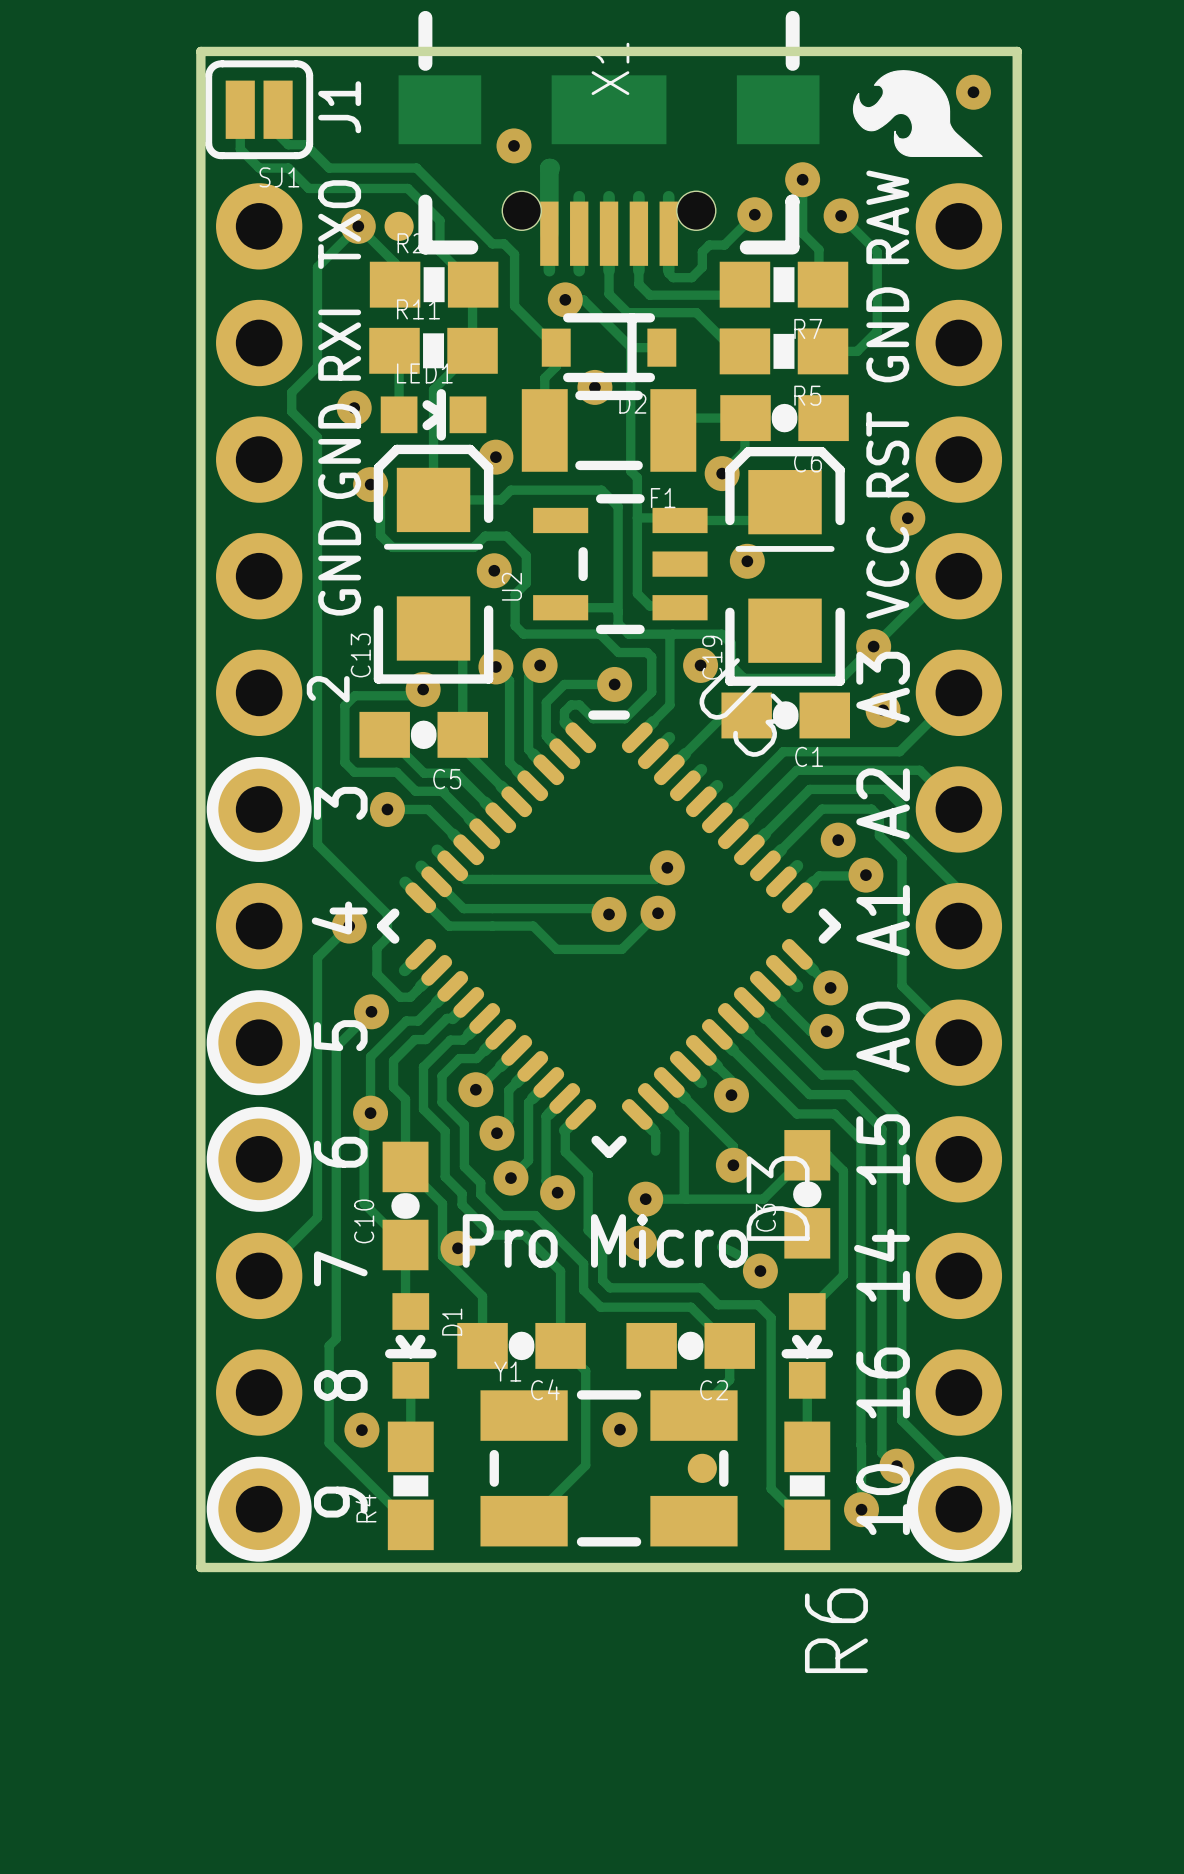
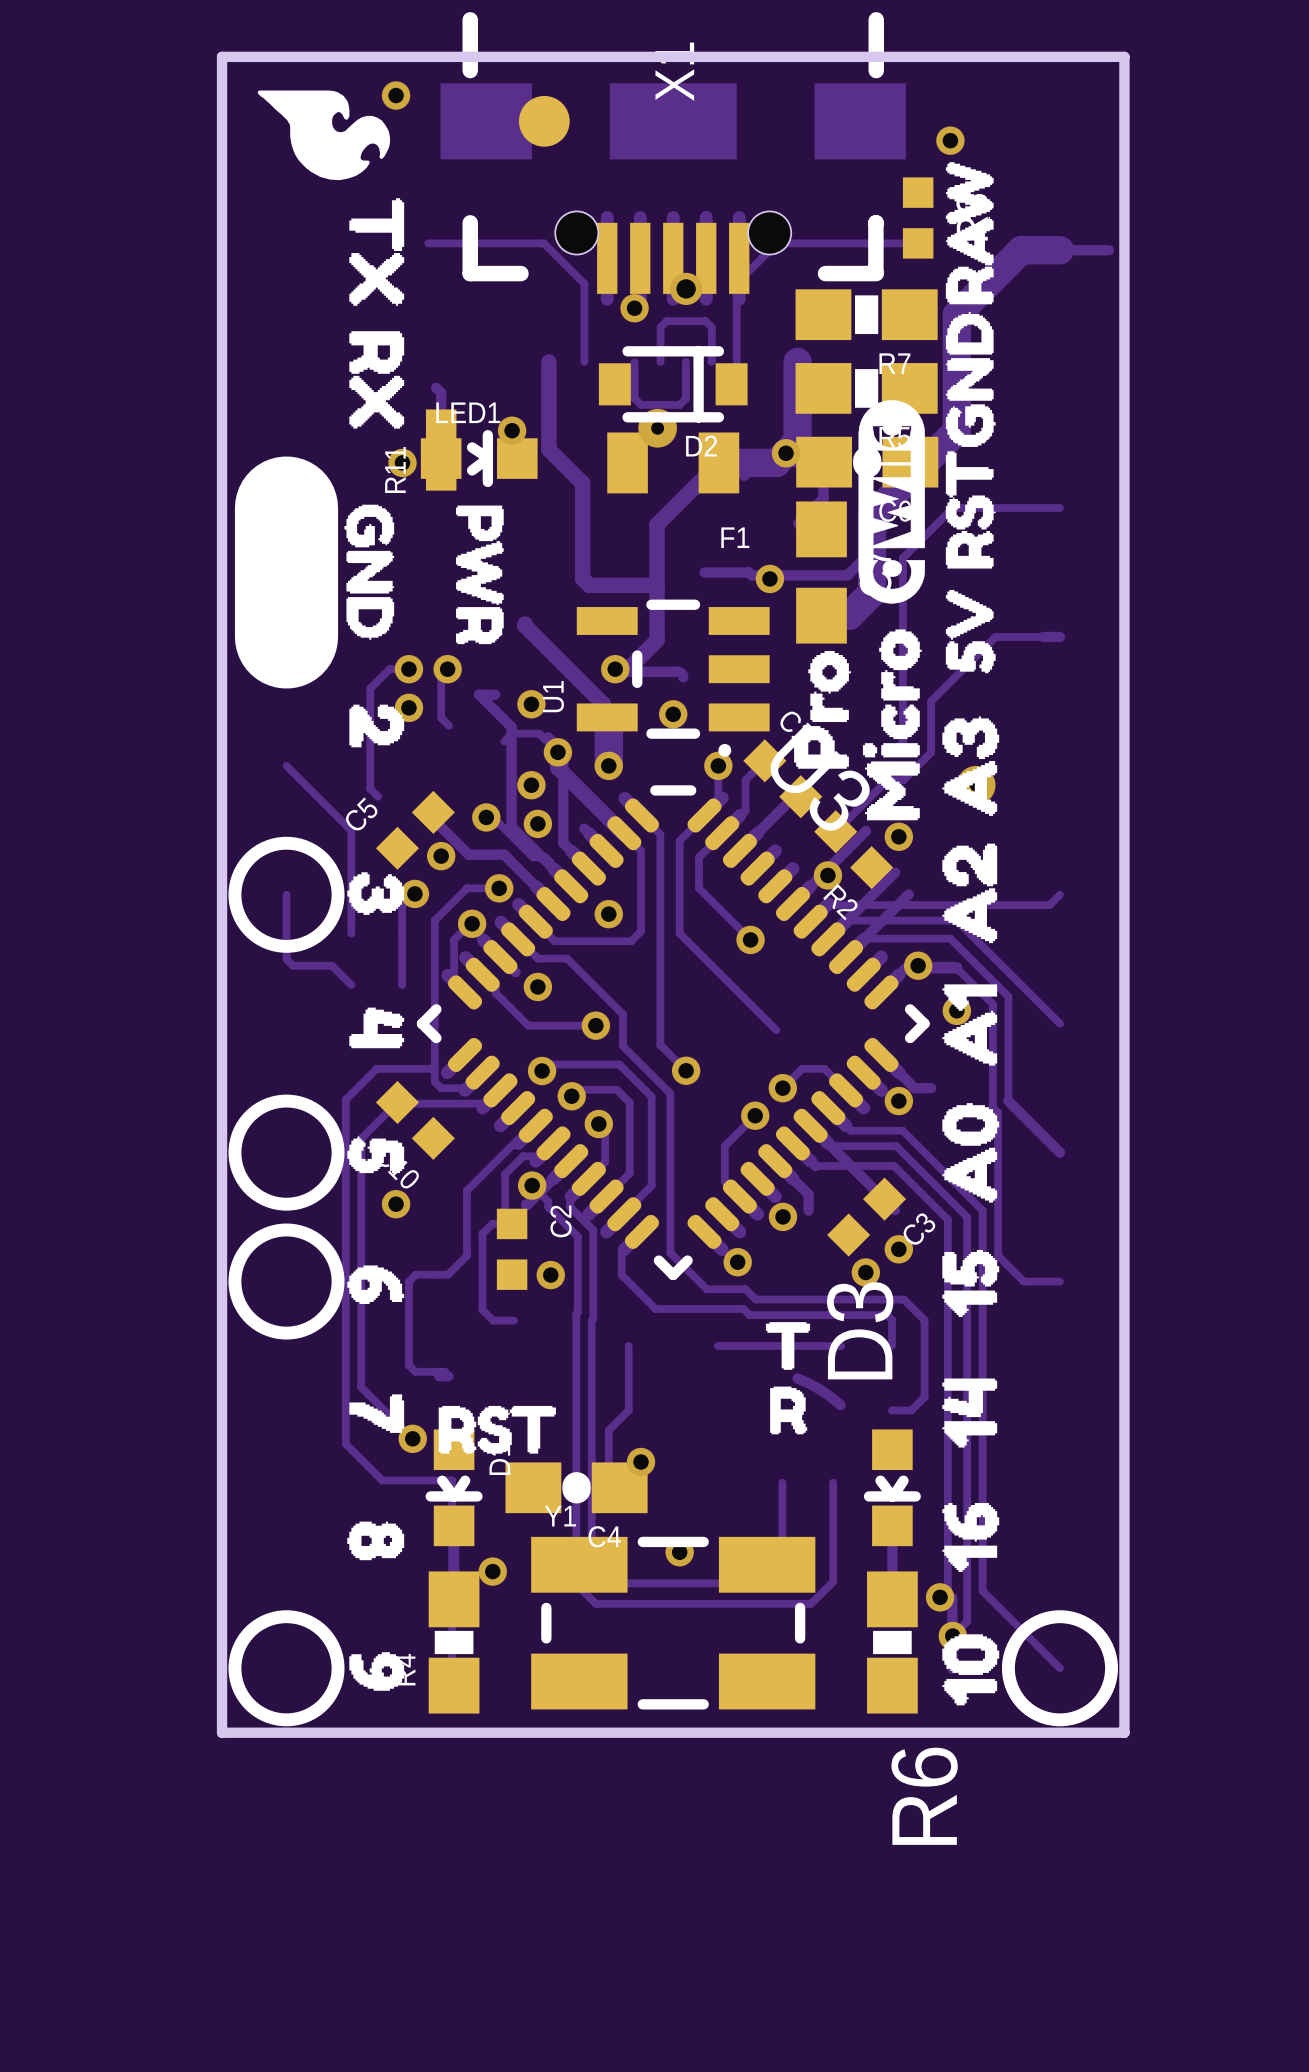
drawing: [852, 70, 983, 157] -> none
drawing: none -> [257, 90, 405, 429]
via: none -> (396, 95)
via: (973, 92) -> none
text: J1 (339, 107) -> none
track: (240, 109) (240, 149) (259, 168) (288, 168) (308, 188) (407, 188) (439, 220) (439, 251) (473, 284) -> none
SJ1: (259, 109) -> none
track: (278, 109) (278, 134) (288, 144) (305, 144) (329, 168) (416, 168) (492, 243) (504, 243) (514, 254) (514, 305) (556, 347) (556, 366) (544, 378) (544, 430) -> none
part: none -> (544, 121)
via: none -> (950, 140)
via: (513, 145) -> none
drawing: none -> [794, 162, 1000, 1317]
track: (550, 168) (549, 233) -> none
track: (802, 179) (802, 233) (818, 249) (818, 280) (822, 284) (822, 270) -> none
via: (802, 179) -> none
part: none -> (918, 218)
track: (754, 214) (724, 245) (709, 245) (702, 252) (702, 267) (691, 277) (673, 277) (668, 273) (668, 233) -> none
via: (754, 214) -> none
track: (841, 215) (877, 252) (877, 331) (857, 351) (822, 351) -> none
via: (841, 215) -> none
text: RAW (887, 217) -> none
track: none -> (428, 243) (543, 243) (584, 283) (584, 361)
track: none -> (918, 243) (776, 243) (736, 283) (736, 361)
text: TXO (339, 224) -> none
via: (358, 226) -> none
part: (399, 226) -> none
track: none -> (1108, 250) (1021, 250) (956, 314) (956, 430) (872, 515) (872, 592) (849, 615) (821, 615)
track: (609, 233) (609, 294) (627, 312) (696, 312) (735, 351) (744, 351) -> none
track: (638, 233) (638, 284) (649, 295) (735, 295) (744, 284) -> none
R2 footprint: [369, 261, 499, 308] -> [814, 810, 894, 890]
via: none -> (686, 288)
track: (395, 284) (395, 263) (358, 226) (317, 267) (317, 366) (291, 392) (291, 411) (317, 437) (317, 844) (387, 914) (387, 937) (376, 948) (376, 973) (400, 997) (410, 997) (420, 986) -> none
track: (472, 285) (472, 350) (433, 389) (433, 499) (501, 499) (510, 490) (601, 490) (618, 506) (618, 623) (628, 634) (721, 634) (731, 643) (731, 665) (743, 678) (841, 678) (943, 576) -> (835, 831) (887, 780) (903, 780) (931, 752) (931, 701) (995, 636) (1043, 636)
track: (565, 299) (583, 299) (631, 347) (661, 347) -> none
via position: (565, 299) -> (634, 308)
track: none -> (711, 361) (711, 327) (705, 321) (666, 321) (660, 327) (660, 361)
R11 footprint: [369, 327, 498, 374] -> [425, 409, 457, 491]
track: none -> (548, 361) (548, 449) (582, 483) (582, 578) (589, 585) (657, 585)
track: none -> (685, 361) (685, 398) (679, 404) (641, 404) (634, 398) (634, 362)
track: none -> (797, 361) (797, 441) (776, 462) (718, 462) (657, 524) (657, 640) (628, 669) (615, 669)
text: GND (887, 334) -> none
text: RXI (339, 345) -> none
track: (630, 348) (630, 471) (637, 477) (637, 593) (649, 605) (678, 605) (680, 607) -> none
via: none -> (512, 430)
F1 footprint: [521, 389, 697, 472] -> [607, 432, 740, 494]
via size: [336, 390, 372, 426] -> [388, 448, 417, 478]
via: none -> (786, 453)
text: GND (339, 451) -> none
text: RST (887, 454) -> none
drawing: none -> [344, 504, 395, 640]
drawing: none -> [456, 505, 504, 645]
via: (495, 457) -> none
line: none -> (286, 508) (286, 636)
track: none -> (1059, 508) (952, 508) (902, 557) (902, 742) (892, 752)
via: (722, 473) -> none
track: (370, 484) (380, 496) (380, 535) (392, 547) (473, 547) (485, 536) (506, 536) (526, 555) (526, 583) (515, 594) (515, 625) (523, 634) (600, 634) (618, 652) (647, 652) (651, 657) (651, 692) (625, 718) (593, 718) (579, 704) (571, 704) (564, 711) (564, 721) (580, 737) -> (686, 1070) (660, 1044) (660, 834) (641, 815)
via: (370, 484) -> none
part: none -> (821, 572)
via: (907, 518) -> none
via: none -> (769, 578)
via: (747, 561) -> none
C13: (433, 564) -> none
track: none -> (524, 624) (603, 703) (603, 717) (608, 718) (608, 765)
U2: (620, 564) -> none
C19: (785, 566) -> none
text: GND (339, 568) -> none
via: (494, 570) -> none
text: VCC (887, 572) -> none
track: none -> (408, 669) (389, 669) (370, 688) (370, 788) (378, 796)
via: none -> (408, 669)
track: none -> (447, 669) (441, 675) (441, 717) (449, 725)
via: none -> (447, 669)
via: none -> (615, 669)
U1: none -> (673, 678)
track: (672, 634) (669, 637) (669, 705) (653, 721) -> none
drawing: none -> [349, 704, 405, 748]
via: none -> (531, 704)
via: none -> (408, 707)
via: none -> (673, 714)
via: (873, 646) -> none
via size: [478, 649, 514, 685] -> [543, 738, 573, 767]
track: (540, 665) (528, 676) (528, 749) -> none
via position: (540, 665) -> (608, 765)
via: (700, 665) -> none
track: (614, 684) (564, 684) (546, 702) (546, 736) -> none
via: (614, 684) -> none
text: A3 (883, 687) -> none
track: none -> (764, 760) (745, 780) (745, 810) (699, 857) (699, 888) (750, 939)
text: 2 (328, 689) -> none
track: (423, 689) (416, 695) (354, 695) (344, 705) (344, 762) (354, 772) (396, 772) (415, 791) (443, 791) (484, 833) -> (504, 741) (512, 733) (539, 733) (557, 752) (557, 767) (641, 850) (641, 931) (631, 941) (554, 941) (535, 921)
via: (423, 689) -> none
track: none -> (286, 765) (351, 830) (351, 933)
track: none -> (718, 765) (718, 802) (679, 840) (679, 933) (776, 1030)
via: none -> (718, 765)
C1 footprint: [721, 692, 851, 739] -> [743, 739, 823, 819]
track: (958, 692) (899, 751) (783, 751) -> none
via: none -> (531, 785)
C5 footprint: [359, 711, 489, 758] -> [375, 790, 455, 870]
track: none -> (486, 817) (492, 823) (499, 823) (533, 857) (545, 857) (550, 862) (550, 865)
via: none -> (486, 817)
via: none -> (537, 823)
via: none -> (898, 836)
via: none -> (441, 856)
drawing: none -> [347, 872, 405, 915]
track: (809, 789) (885, 789) (901, 805) (901, 832) (958, 889) (958, 926) -> (846, 920) (956, 920) (1059, 1023)
via size: [369, 791, 405, 827] -> [400, 879, 430, 909]
via: none -> (827, 875)
text: 3 (340, 803) -> none
track: none -> (499, 888) (466, 888) (434, 920) (434, 1081) (441, 1088) (468, 1088) (483, 1073)
via: none -> (499, 888)
text: A2 (883, 803) -> none
track: none -> (414, 893) (402, 905) (402, 985)
track: none -> (286, 894) (286, 959) (292, 965) (332, 965) (351, 985)
track: (387, 809) (428, 809) (453, 834) -> none
track: (822, 809) (871, 809) (879, 816) (879, 835) (901, 858) (901, 985) (912, 996) -> (864, 938) (950, 938) (1008, 996) (1008, 1101)
track: (958, 809) (919, 770) (796, 770) (733, 833) -> (1059, 894) (1049, 905) (827, 905) (810, 921)
via: none -> (608, 914)
via: none -> (472, 923)
via: (838, 840) -> none
track: none -> (518, 939) (537, 958) (567, 958) (622, 1014) (622, 1046) (670, 1093) (670, 1252) (706, 1289) (745, 1289) (755, 1299) (903, 1299) (924, 1320) (924, 1397) (911, 1410) (891, 1410)
part: (259, 867) -> none
track: (667, 867) (655, 879) (464, 879) -> none
via position: (667, 867) -> (750, 939)
part: (958, 867) -> none
track: none -> (918, 965) (954, 965) (992, 1004) (992, 1107) (998, 1112) (998, 1255) (1023, 1281) (1059, 1281)
via: none -> (918, 965)
via: (865, 875) -> none
track: (436, 881) (463, 908) (603, 908) (609, 914) -> (483, 974) (495, 986) (495, 992) (528, 1025) (595, 1025)
via: none -> (537, 986)
track: (420, 897) (448, 926) (533, 926) (556, 949) (621, 949) (658, 913) -> (465, 992) (454, 980) (454, 939) (472, 923)
drawing: none -> [349, 1007, 405, 1049]
via: (658, 913) -> none
via: (609, 914) -> none
via: none -> (956, 1010)
text: 4 (339, 917) -> none
text: A1 (883, 920) -> none
track: (349, 926) (317, 957) (317, 1217) (259, 1275) -> none
via: (349, 926) -> none
via: none -> (595, 1025)
track: none -> (434, 1068) (376, 1068) (345, 1099) (345, 1443) (382, 1480) (452, 1480) (452, 1688)
track: none -> (542, 1071) (548, 1064) (619, 1064) (651, 1096) (651, 1185) (623, 1213)
via: none -> (542, 1071)
via: none -> (686, 1070)
track: none -> (782, 1088) (802, 1068) (824, 1068) (846, 1090)
via: none -> (782, 1088)
track: none -> (500, 1090) (487, 1103) (397, 1102) (361, 1138) (361, 1387) (412, 1438)
via position: (830, 987) -> (898, 1101)
track: none -> (571, 1096) (578, 1089) (616, 1089) (629, 1102) (629, 1173) (606, 1196)
via: none -> (571, 1096)
track: (436, 1002) (418, 1021) (406, 1021) (370, 1056) (370, 1113) (364, 1119) (364, 1203) (405, 1245) (405, 1306) (410, 1311) -> none
track: (749, 1002) (821, 1075) (854, 1075) (901, 1122) (901, 1420) (958, 1477) (958, 1509) -> (828, 1108) (850, 1130) (902, 1130) (982, 1210) (982, 1590) (1059, 1668)
track: (781, 1002) (810, 1031) (826, 1031) -> none
track: none -> (755, 1115) (724, 1146) (724, 1181) (739, 1196)
via: none -> (755, 1115)
track: (371, 1011) (336, 1047) (336, 1338) (329, 1345) (329, 1443) (410, 1524) -> none
via: (371, 1011) -> none
track: none -> (598, 1124) (605, 1130) (605, 1161) (570, 1197) (570, 1207) (593, 1230) (591, 1565) (609, 1583) (771, 1583) (782, 1571) (782, 1482)
via: none -> (598, 1124)
track: (452, 1018) (446, 1018) (425, 1039) (414, 1039) (393, 1060) (393, 1087) (405, 1099) (405, 1166) (413, 1174) -> none
track: none -> (535, 1125) (520, 1140) (516, 1140) (466, 1190) (466, 1255) (448, 1274) (415, 1274) (408, 1281) (408, 1365) (415, 1371) (445, 1371)
drawing: none -> [347, 1136, 405, 1174]
via: (826, 1031) -> none
track: (468, 1034) (462, 1040) (450, 1040) (423, 1067) (423, 1109) (445, 1131) (445, 1176) (462, 1193) (462, 1204) (492, 1235) (524, 1235) (560, 1271) (560, 1345) (585, 1371) (585, 1465) (529, 1521) (524, 1521) -> none
track: none -> (553, 1143) (540, 1156) (523, 1156) (505, 1174) (505, 1216) (512, 1223) (492, 1223) (482, 1233) (482, 1309) (493, 1320) (514, 1320)
text: 5 (340, 1035) -> none
track: none -> (831, 1146) (896, 1146) (967, 1217) (967, 1621) (952, 1636)
text: A0 (883, 1037) -> none
track: (484, 1050) (476, 1058) (459, 1058) (442, 1075) (442, 1102) (464, 1124) (464, 1166) (480, 1183) (480, 1194) (501, 1215) (535, 1215) (583, 1263) (583, 1290) (600, 1307) (690, 1307) (729, 1345) (729, 1379) (693, 1415) -> none
track: none -> (571, 1161) (547, 1185) (532, 1185) (548, 1201) (548, 1207) (577, 1236) (576, 1584) (595, 1603) (811, 1603) (833, 1581) (833, 1482)
track: (737, 1054) (796, 1113) (834, 1113) (860, 1140) (860, 1445) -> (815, 1166) (894, 1166) (947, 1219) (947, 1589) (940, 1597)
via size: [458, 1072, 494, 1108] -> [517, 1171, 547, 1200]
track: (516, 1082) (508, 1090) (508, 1121) (496, 1133) -> none
track: (809, 1094) (847, 1094) (881, 1129) (881, 1453) (896, 1466) -> none
via position: (731, 1095) -> (782, 1216)
track: (532, 1098) (528, 1102) (528, 1160) (510, 1178) -> none
track: (685, 1098) (733, 1146) (733, 1165) -> none
via position: (370, 1113) -> (396, 1204)
track: (548, 1114) (546, 1116) (546, 1181) (557, 1192) -> none
track: none -> (641, 1231) (621, 1251) (621, 1275) (655, 1309) (743, 1309) (749, 1315) (887, 1315) (891, 1319) (891, 1345)
track: (669, 1114) (684, 1129) (684, 1196) (686, 1199) -> none
track: (565, 1130) (565, 1151) (588, 1174) (588, 1230) (602, 1244) (602, 1280) (609, 1287) (701, 1287) (718, 1304) (757, 1304) (771, 1317) (771, 1488) (807, 1524) -> none
track: (653, 1130) (655, 1132) (655, 1151) -> none
C3 footprint: [784, 1130, 831, 1259] -> [827, 1177, 907, 1257]
via: none -> (898, 1249)
via: (496, 1133) -> none
C10 footprint: [382, 1141, 429, 1271] -> [375, 1080, 455, 1160]
via: none -> (737, 1262)
drawing: none -> [347, 1265, 405, 1305]
text: 15 (883, 1149) -> none
via: none -> (865, 1272)
text: 6 (340, 1152) -> none
via: none -> (550, 1275)
track: (796, 1155) (827, 1155) (843, 1170) (843, 1275) (807, 1311) -> none
track: (807, 1155) (763, 1199) (645, 1199) -> none
via: (733, 1165) -> none
track: (413, 1174) (442, 1203) (442, 1256) (482, 1296) (482, 1345) -> none
via: (510, 1178) -> none
via: (557, 1192) -> none
drawing: none -> [765, 1322, 811, 1435]
via: (645, 1199) -> none
track: none -> (628, 1345) (628, 1410) (608, 1430) (608, 1487) (621, 1500)
track: none -> (717, 1345) (841, 1345)
text: Pro (510, 1240) -> none
text: Micro (669, 1240) -> none
via: (639, 1243) -> none
drawing: none -> [942, 1378, 1000, 1573]
via: (458, 1248) -> none
drawing: none -> [349, 1394, 556, 1456]
text: 14 (881, 1265) -> none
text: 7 (340, 1268) -> none
via: (760, 1271) -> none
via: none -> (412, 1438)
via: none -> (641, 1462)
C2 footprint: [626, 1322, 755, 1369] -> [496, 1208, 528, 1290]
drawing: none -> [347, 1521, 405, 1561]
text: 16 (883, 1382) -> none
text: 8 (340, 1385) -> none
via: none -> (492, 1571)
via position: (620, 1429) -> (679, 1552)
via: (361, 1430) -> none
via: none -> (940, 1597)
via: (896, 1466) -> none
part: (702, 1468) -> none
drawing: none -> [942, 1634, 1000, 1706]
drawing: none -> [349, 1652, 405, 1691]
text: 10 (883, 1499) -> none
text: 9 (340, 1502) -> none
via position: (861, 1509) -> (952, 1636)

